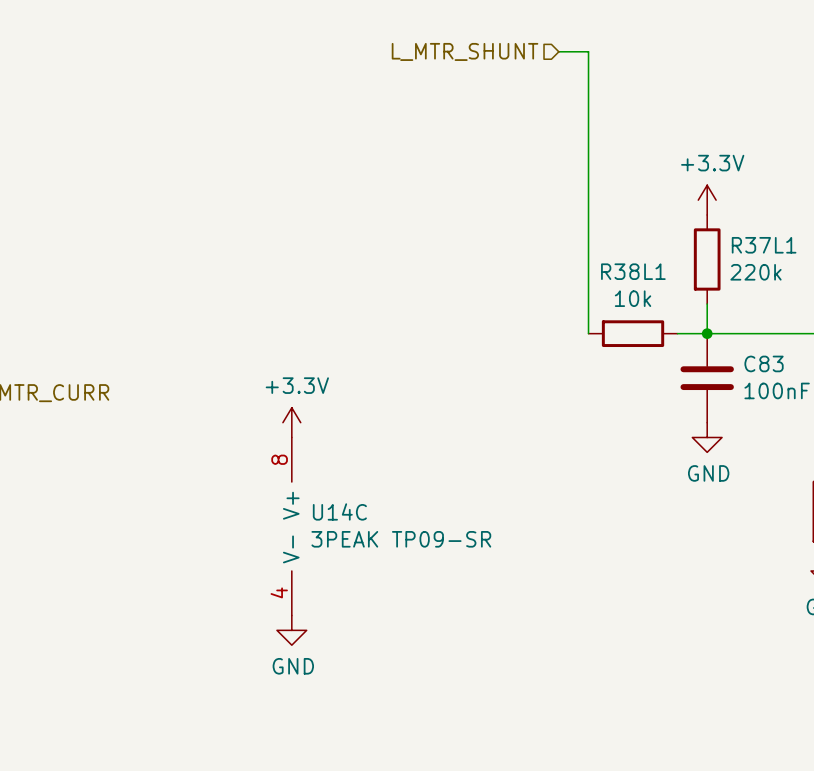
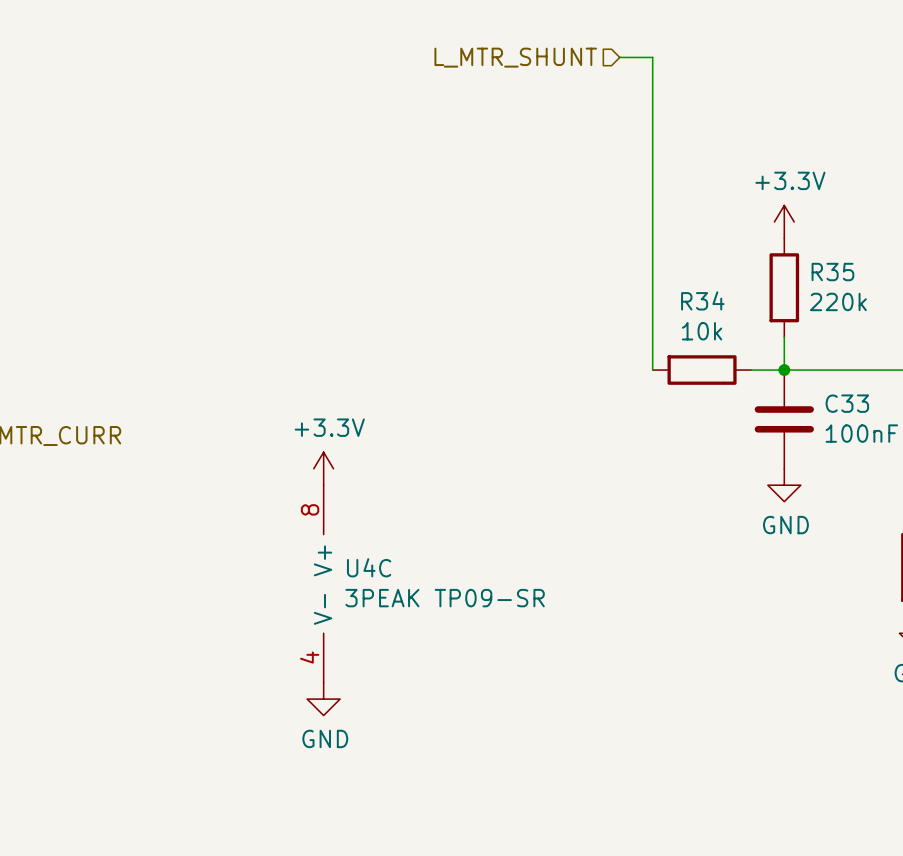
R37L1 name: R37L1 (764, 245) -> R35 (832, 272)
R38L1 name: R38L1 (633, 271) -> R34 (702, 300)
C83 name: C83 (764, 363) -> C33 (847, 403)
U14C name: U14C (339, 511) -> U4C (369, 567)

